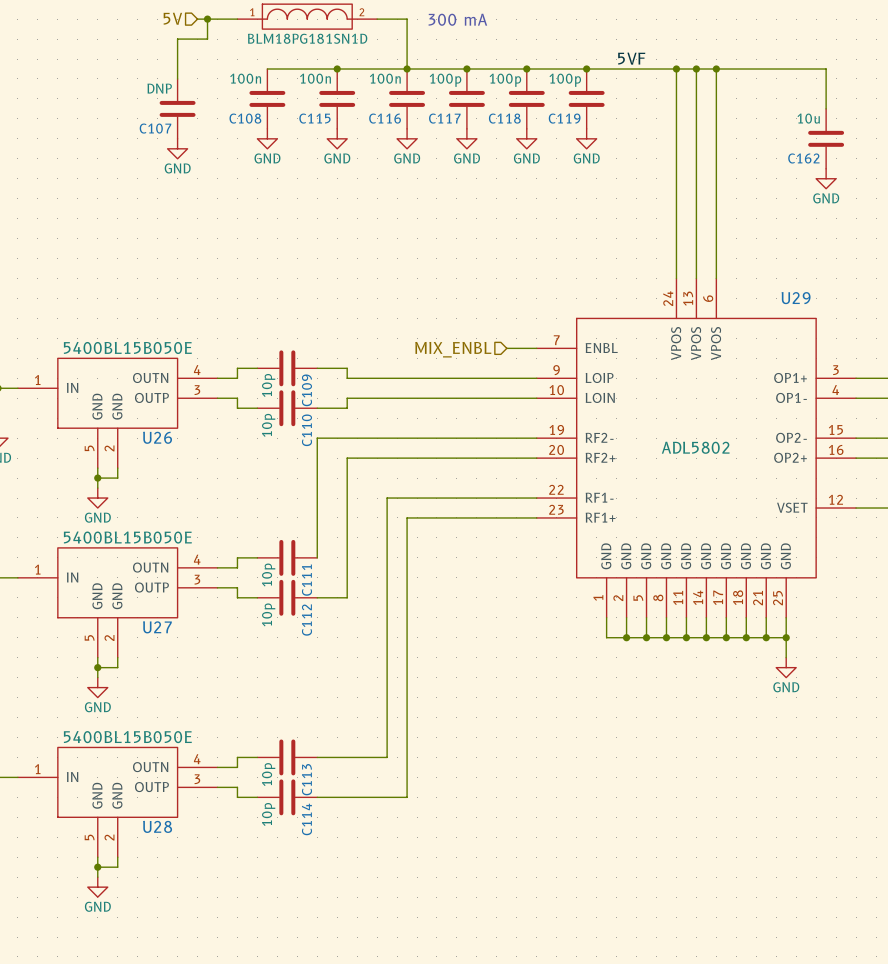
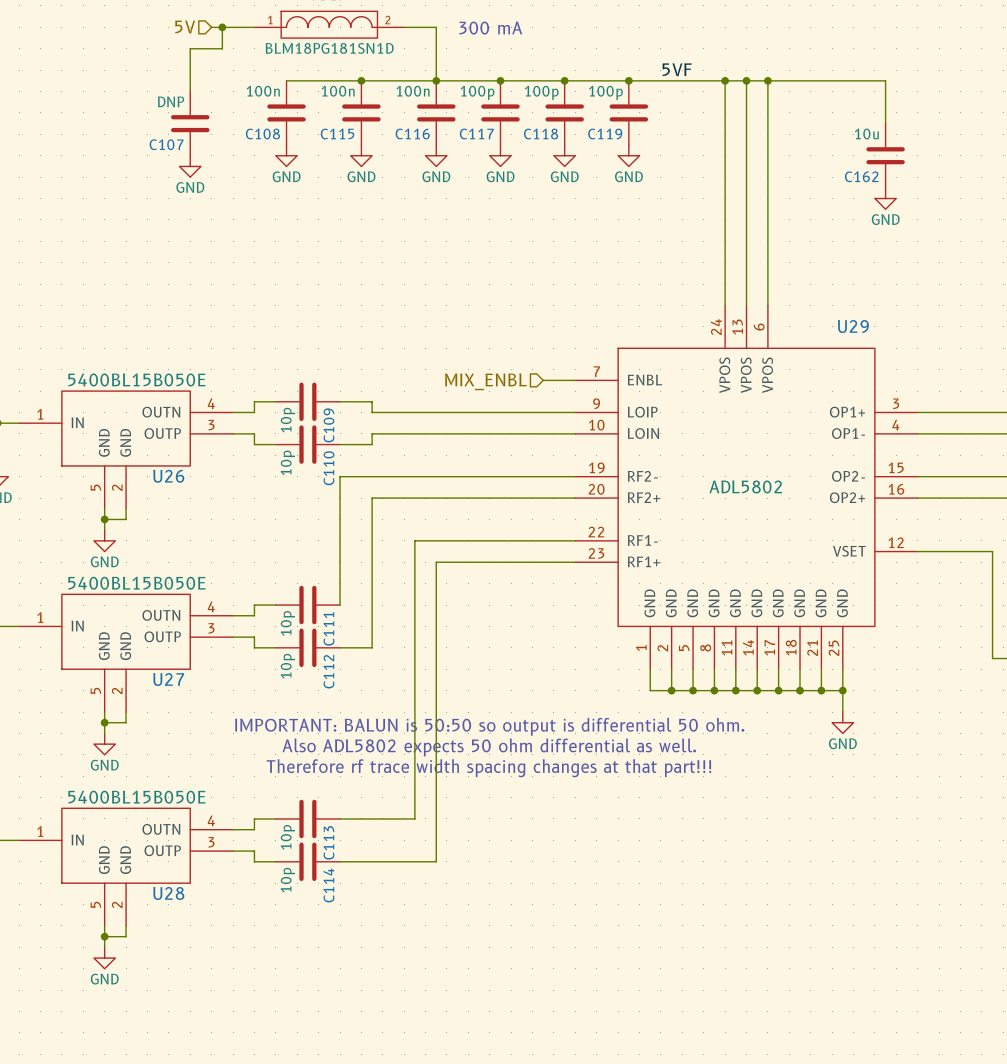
text: none -> IMPORTANT: BALUN is 50:50 so output is differential 50 ohm. (489, 726)
text: none -> Also ADL5802 expects 50 ohm differential as well. (489, 747)
text: none -> Therefore rf trace width spacing changes at that part!!! (488, 768)

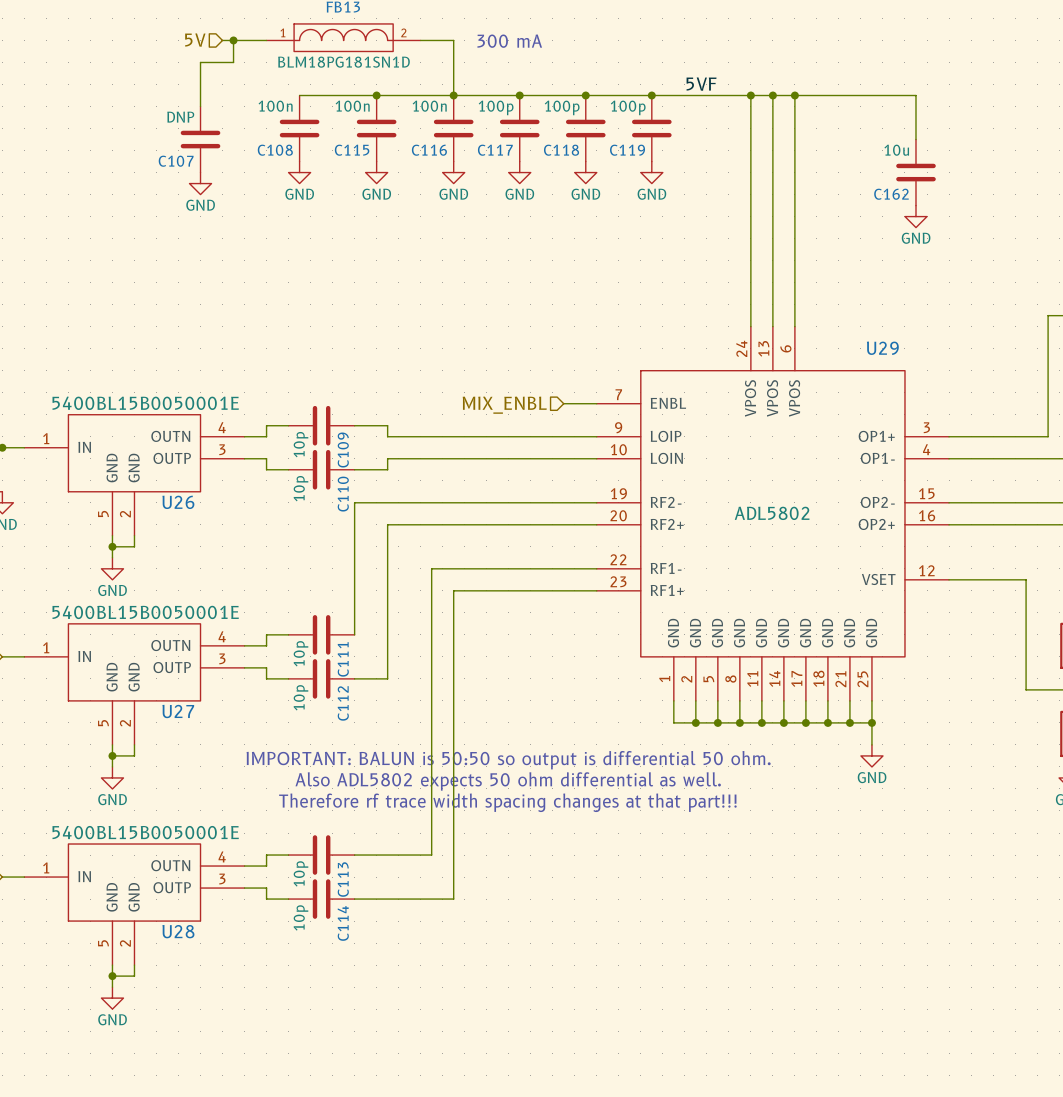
U26 value: 5400BL15B050E (136, 379) -> 5400BL15B0050001E (145, 403)
U27 value: 5400BL15B050E (136, 583) -> 5400BL15B0050001E (145, 612)
U28 value: 5400BL15B050E (136, 797) -> 5400BL15B0050001E (145, 832)

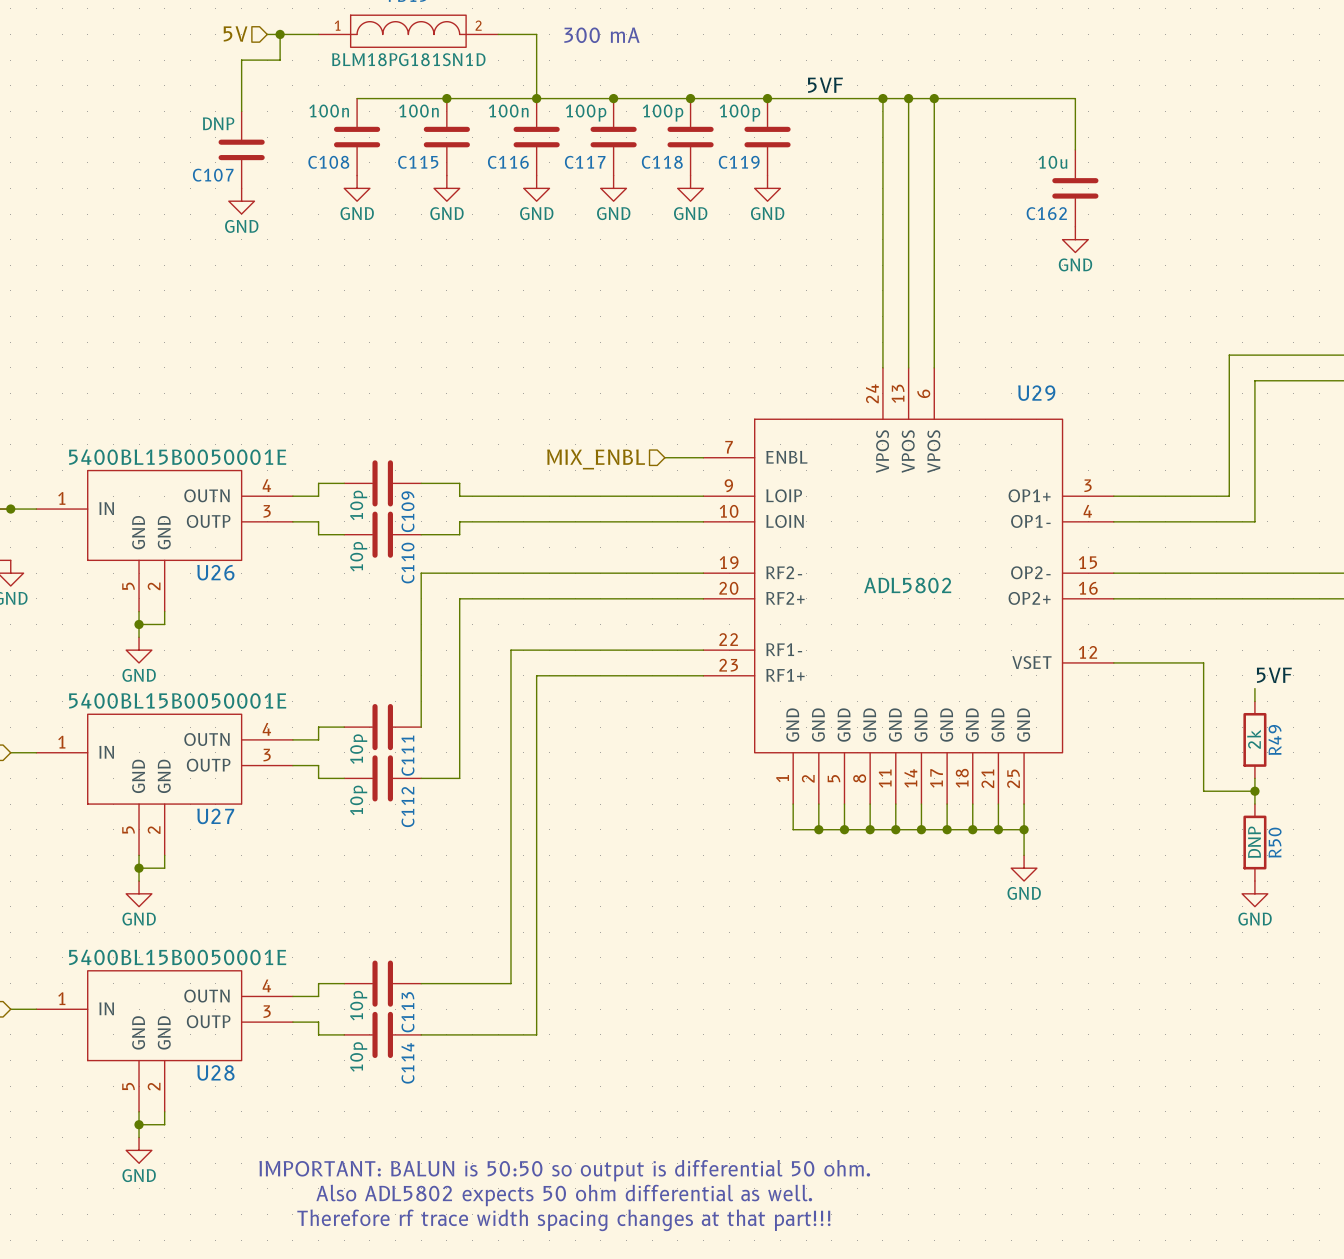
text: IMPORTANT: BALUN is 50:50 so output is differential 50 ohm. (508, 760) -> none
text: Also ADL5802 expects 50 ohm differential as well. (508, 781) -> none
text: Therefore rf trace width spacing changes at that part!!! (507, 802) -> none
text: none -> IMPORTANT: BALUN is 50:50 so output is differential 50 ohm. (564, 1170)
text: none -> Also ADL5802 expects 50 ohm differential as well. (564, 1195)
text: none -> Therefore rf trace width spacing changes at that part!!! (563, 1220)

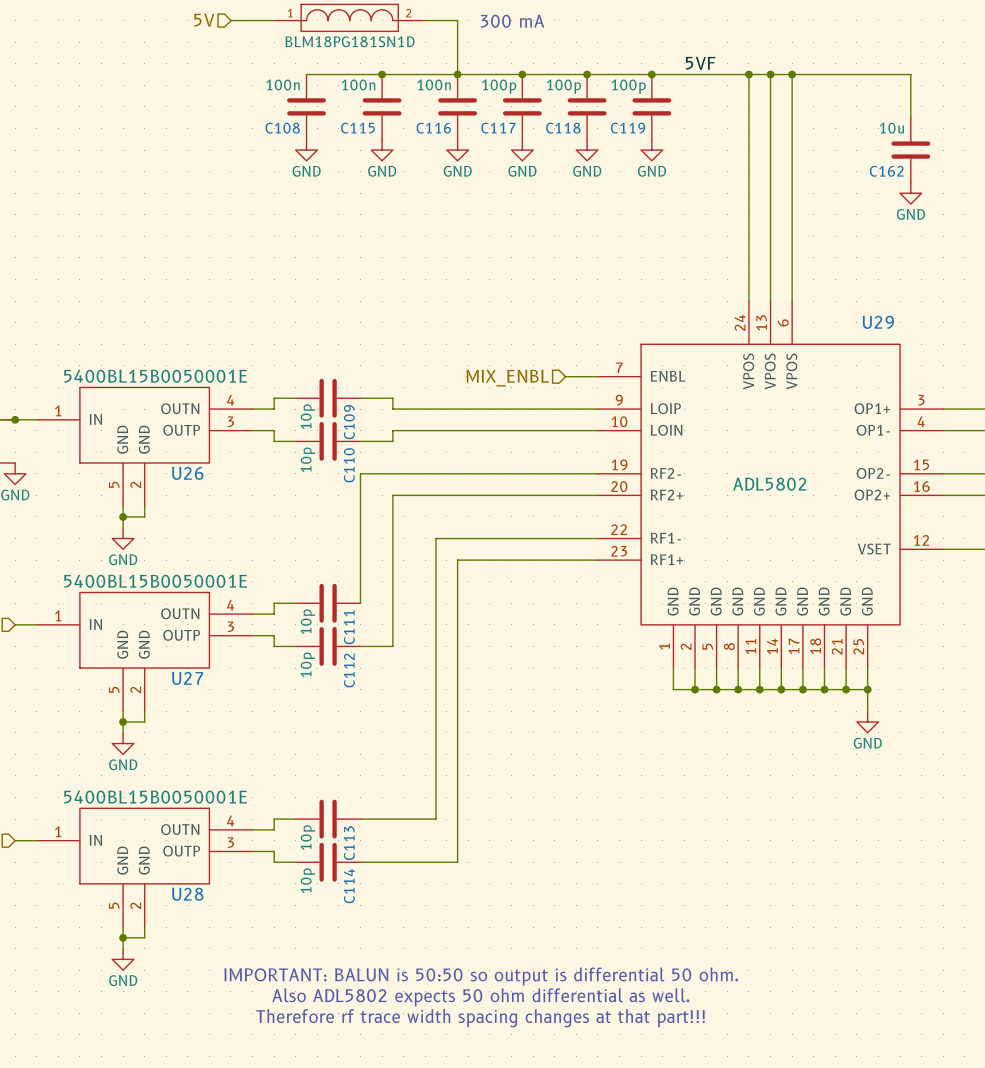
wire: (280, 34) (280, 60) (241, 60) (241, 111) -> none
junction: (280, 34) -> none
C107: DNP (241, 149) -> none
power symbol: GND (241, 201) -> none

